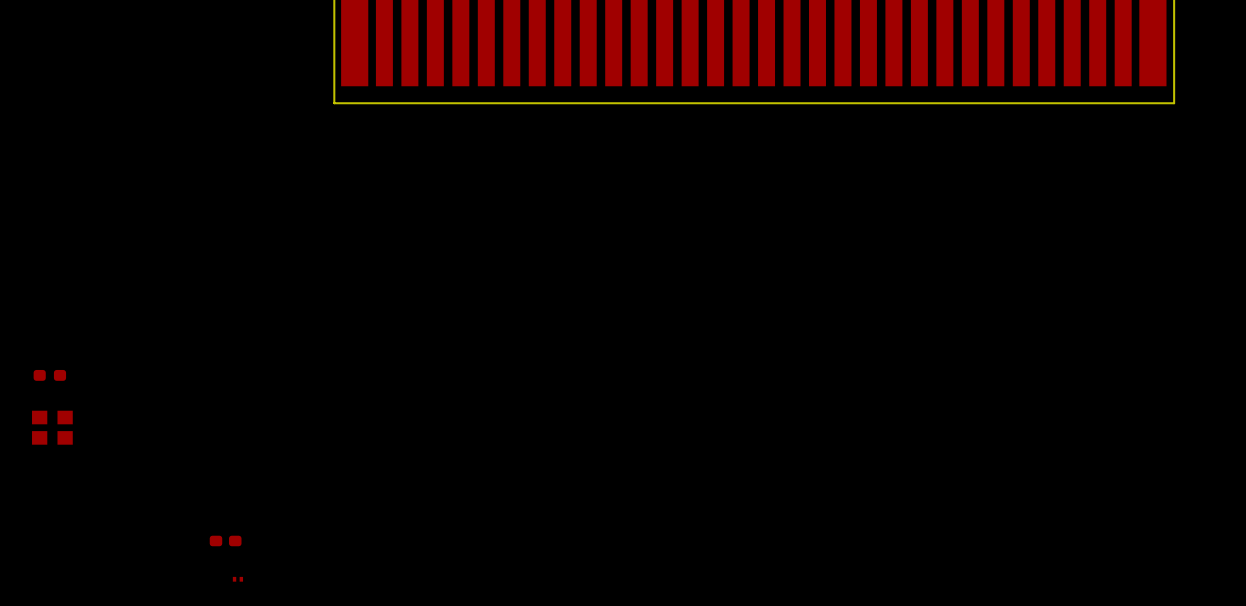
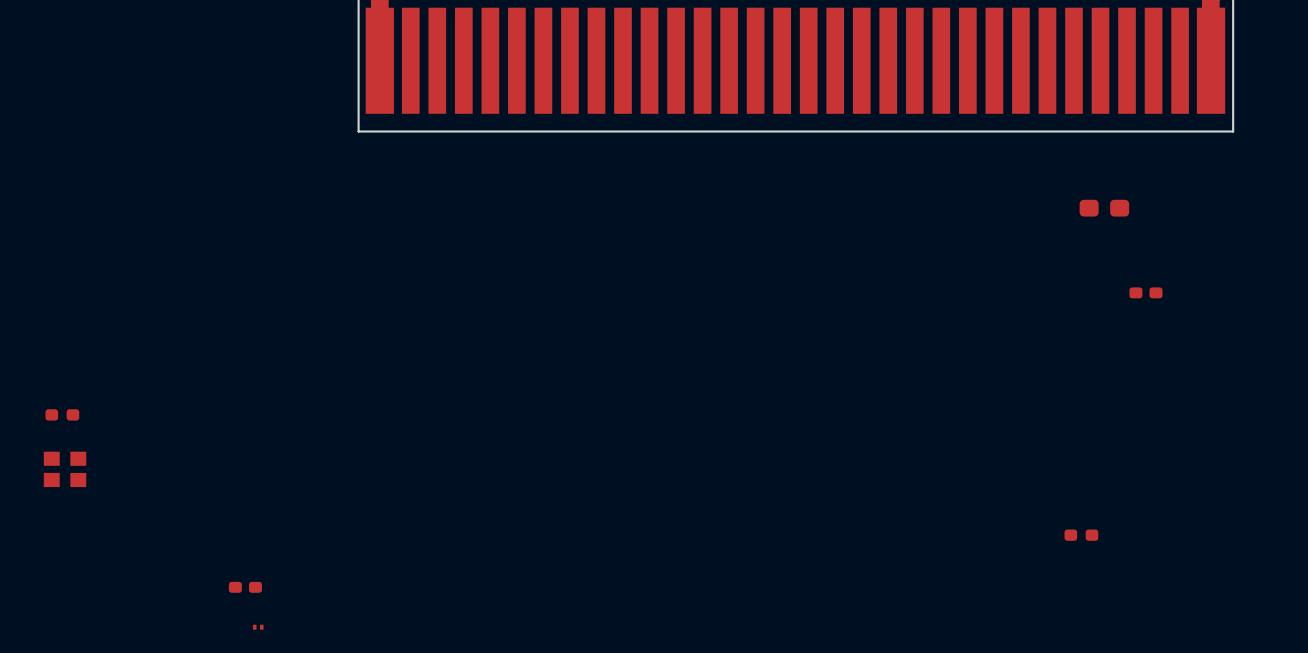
part: none -> (1104, 208)
part: none -> (1145, 292)
part: none -> (1081, 535)

